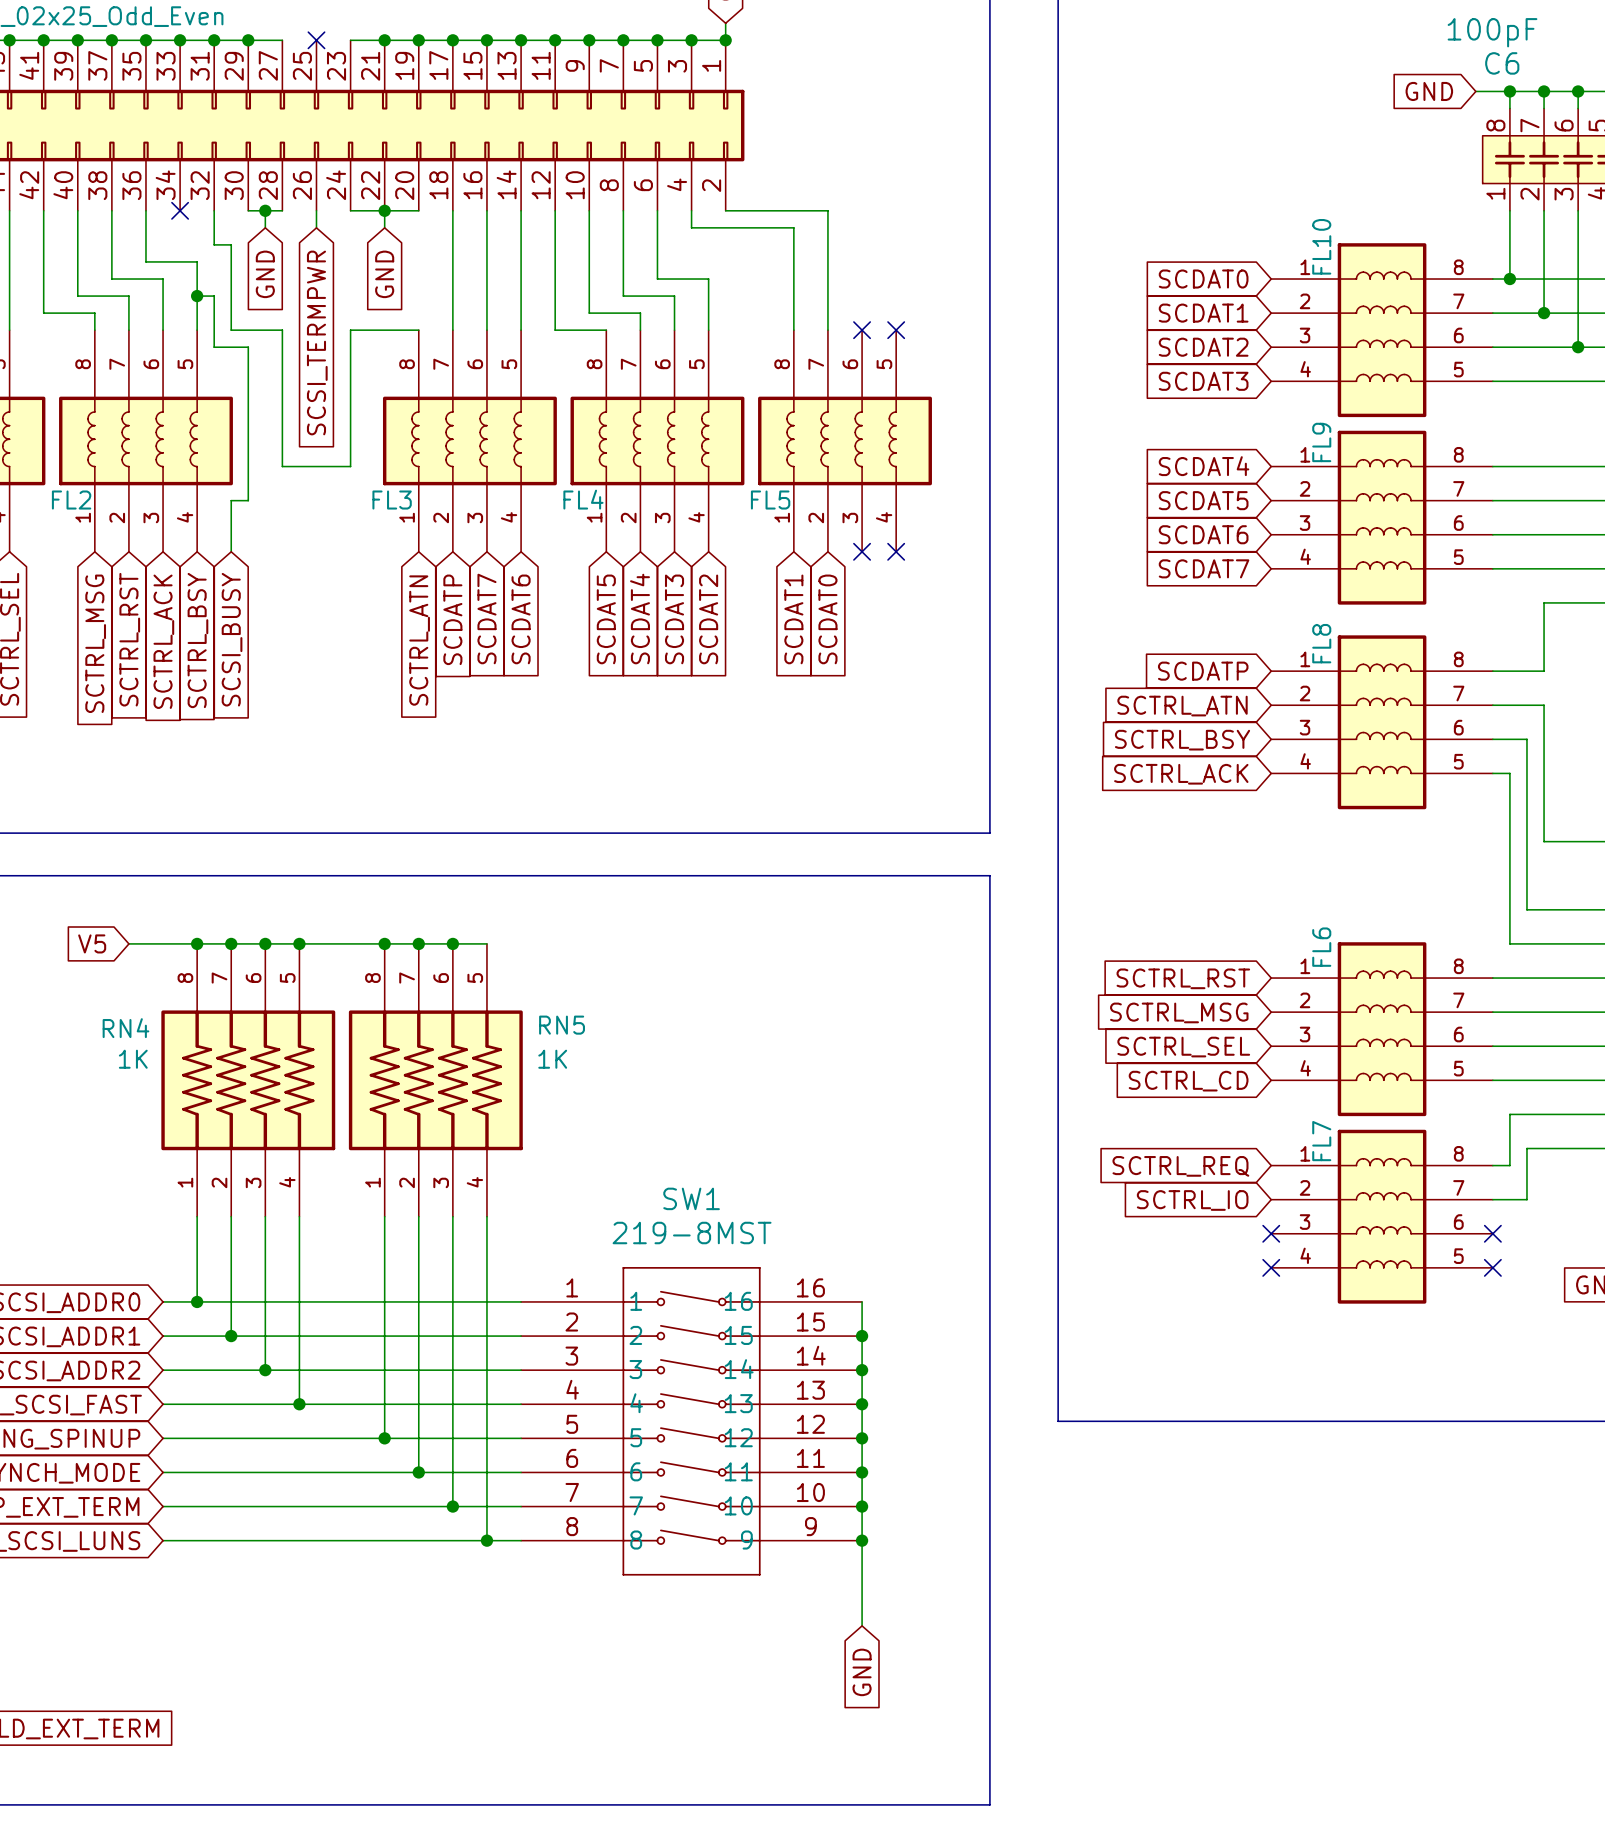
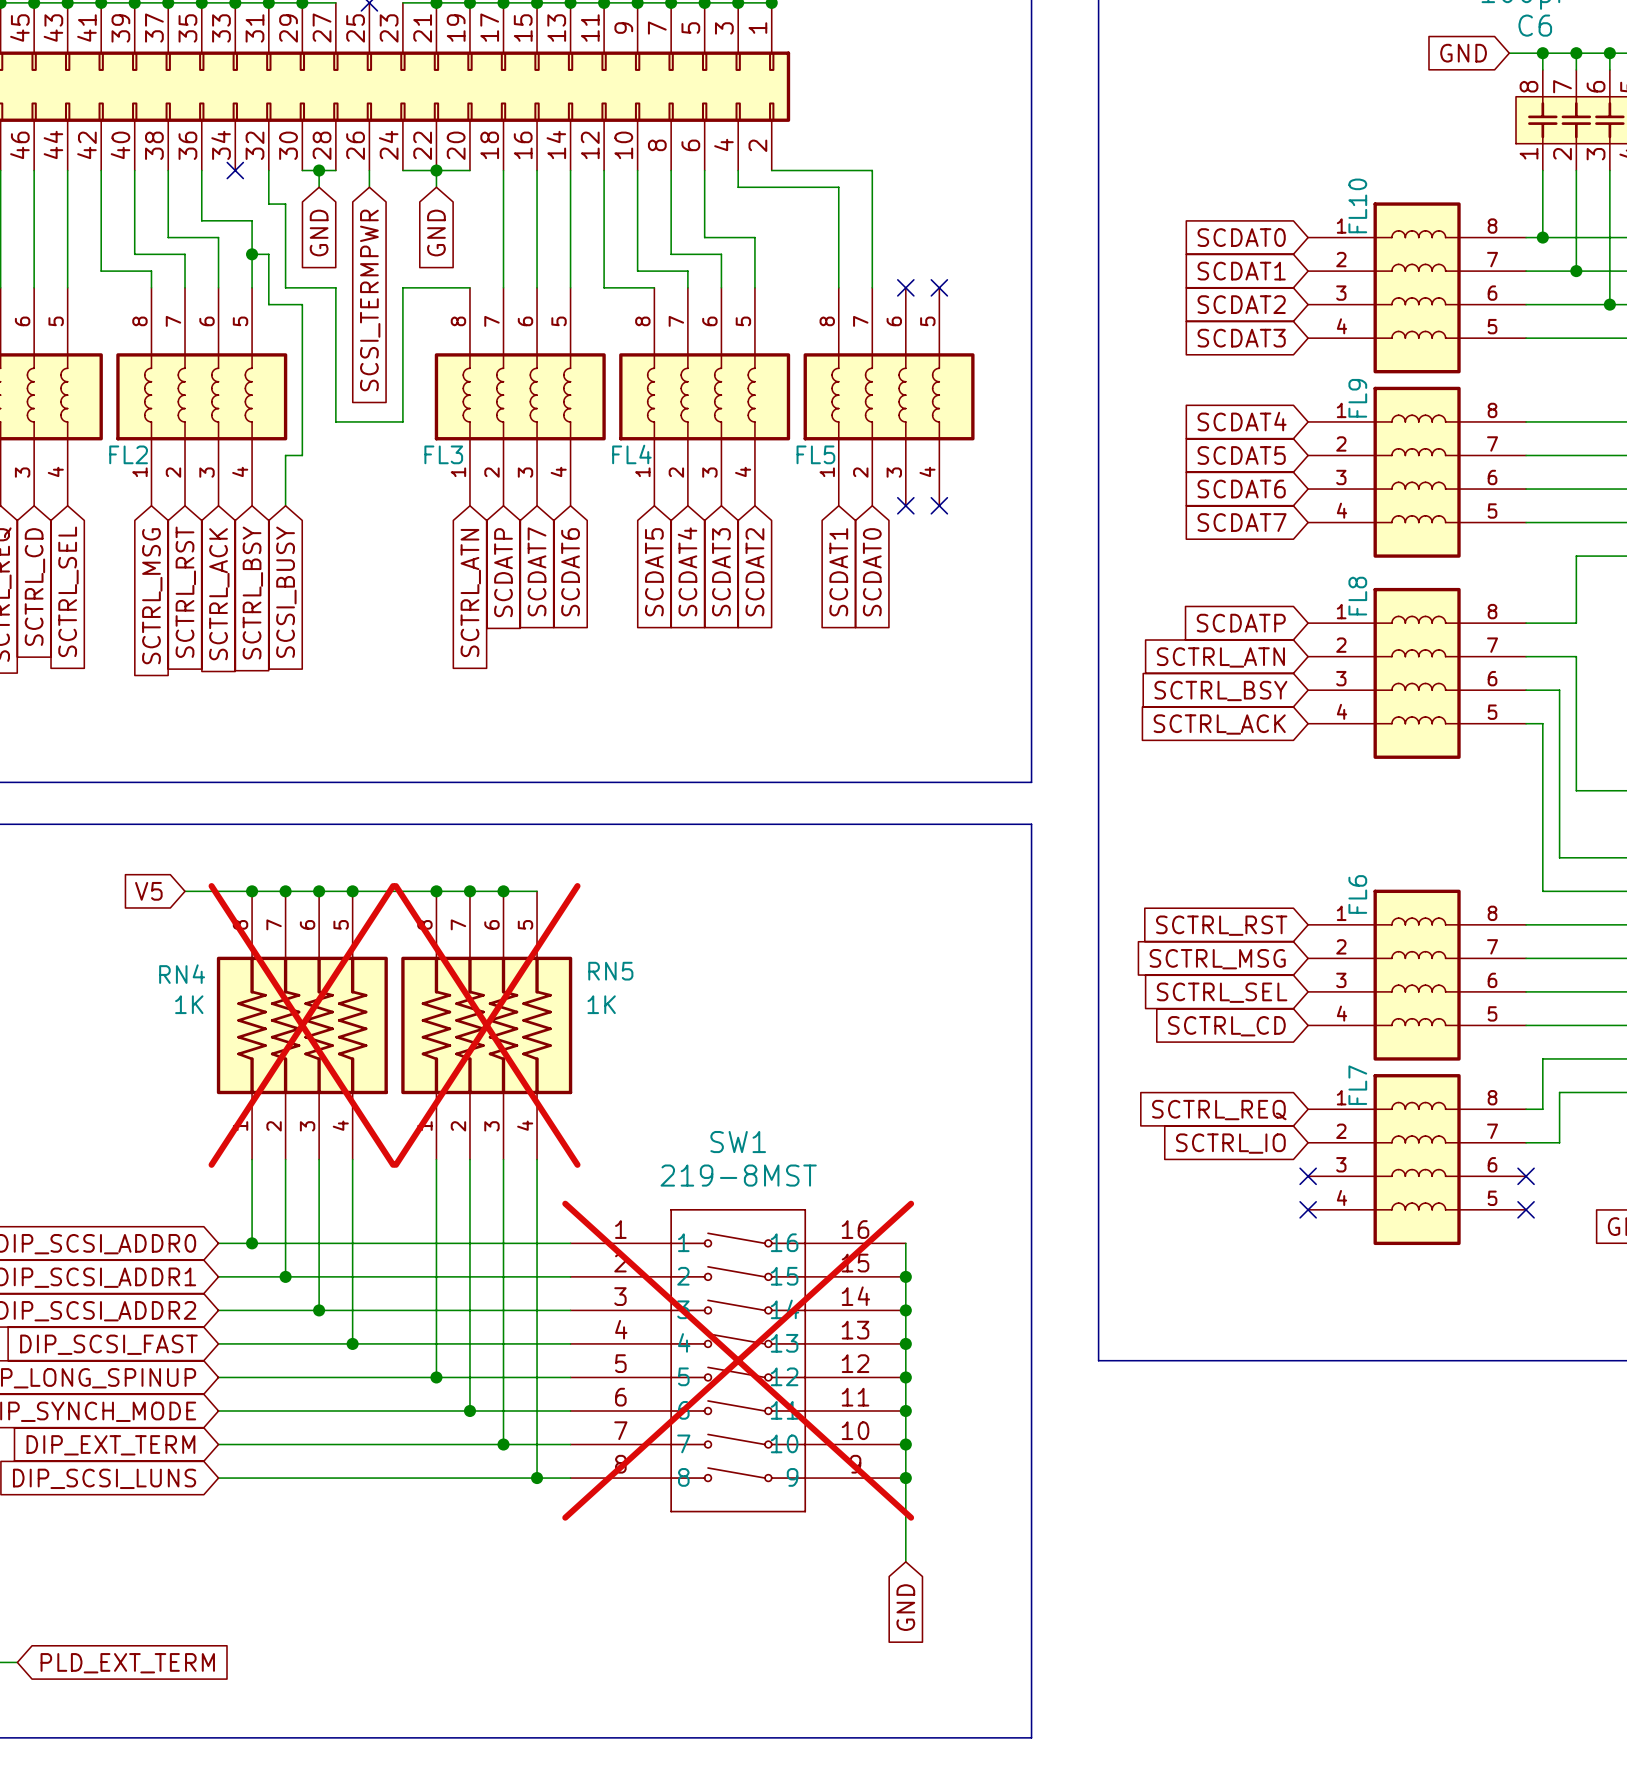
RN4 do-not-place cross: none -> (302, 1025)
RN5 do-not-place cross: none -> (486, 1025)
SW1 do-not-place cross: none -> (738, 1360)

